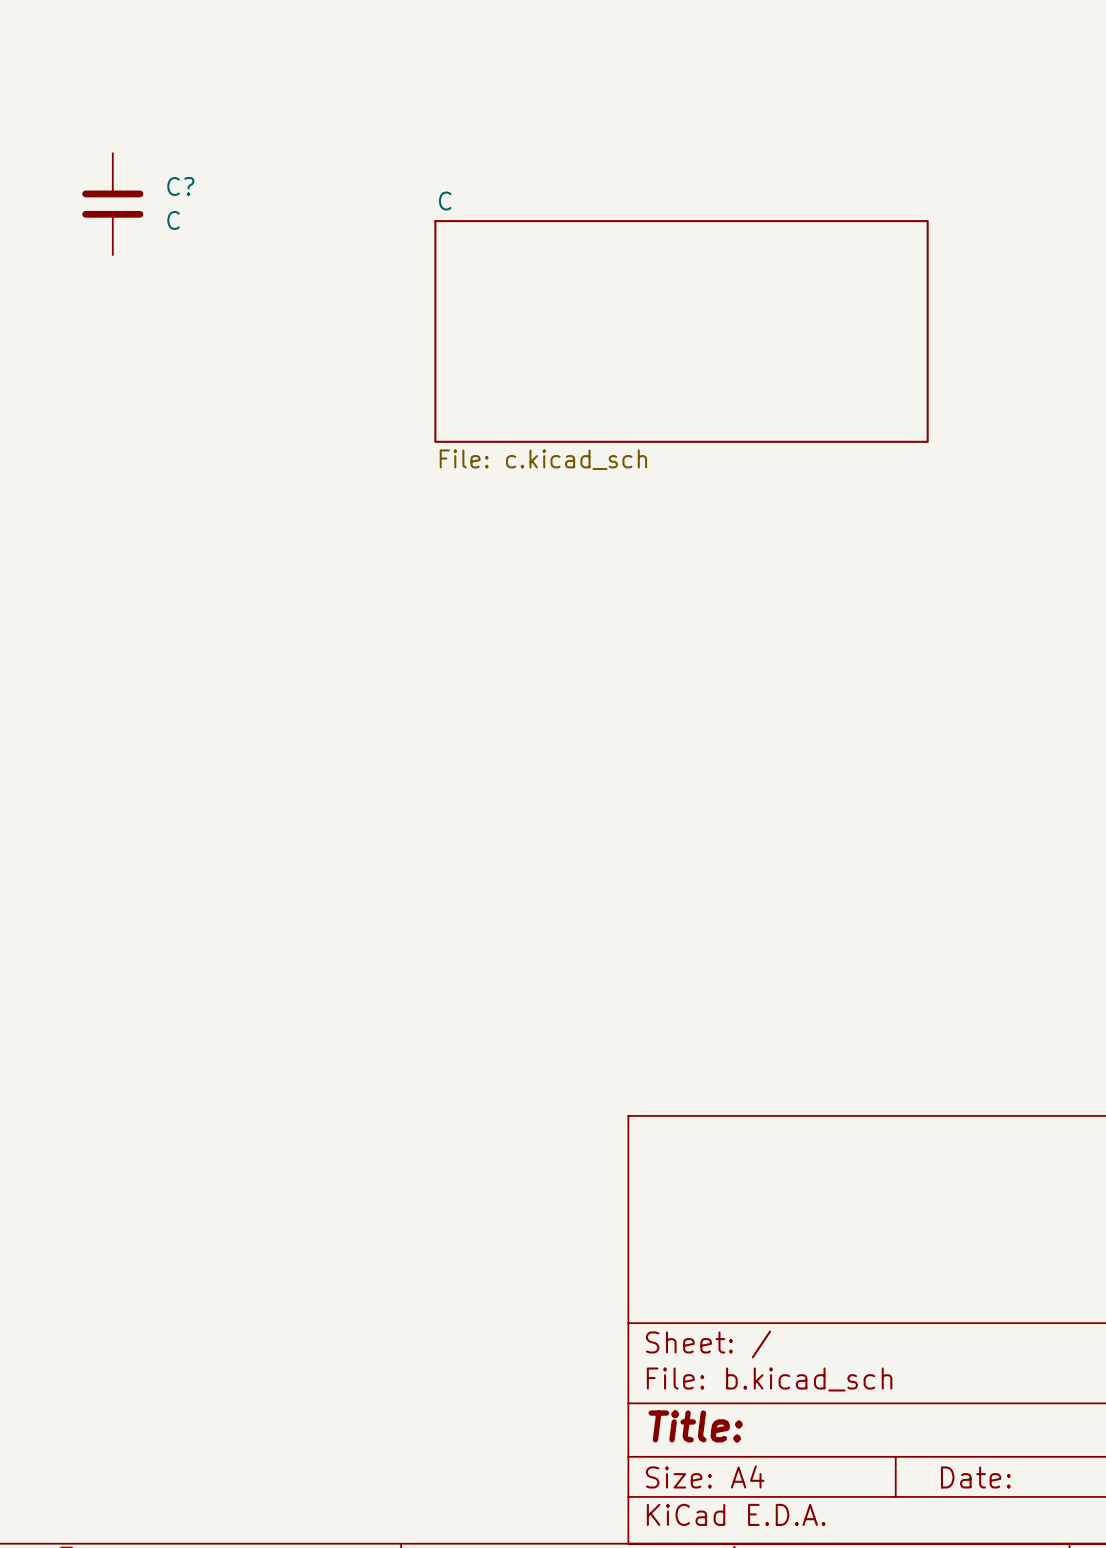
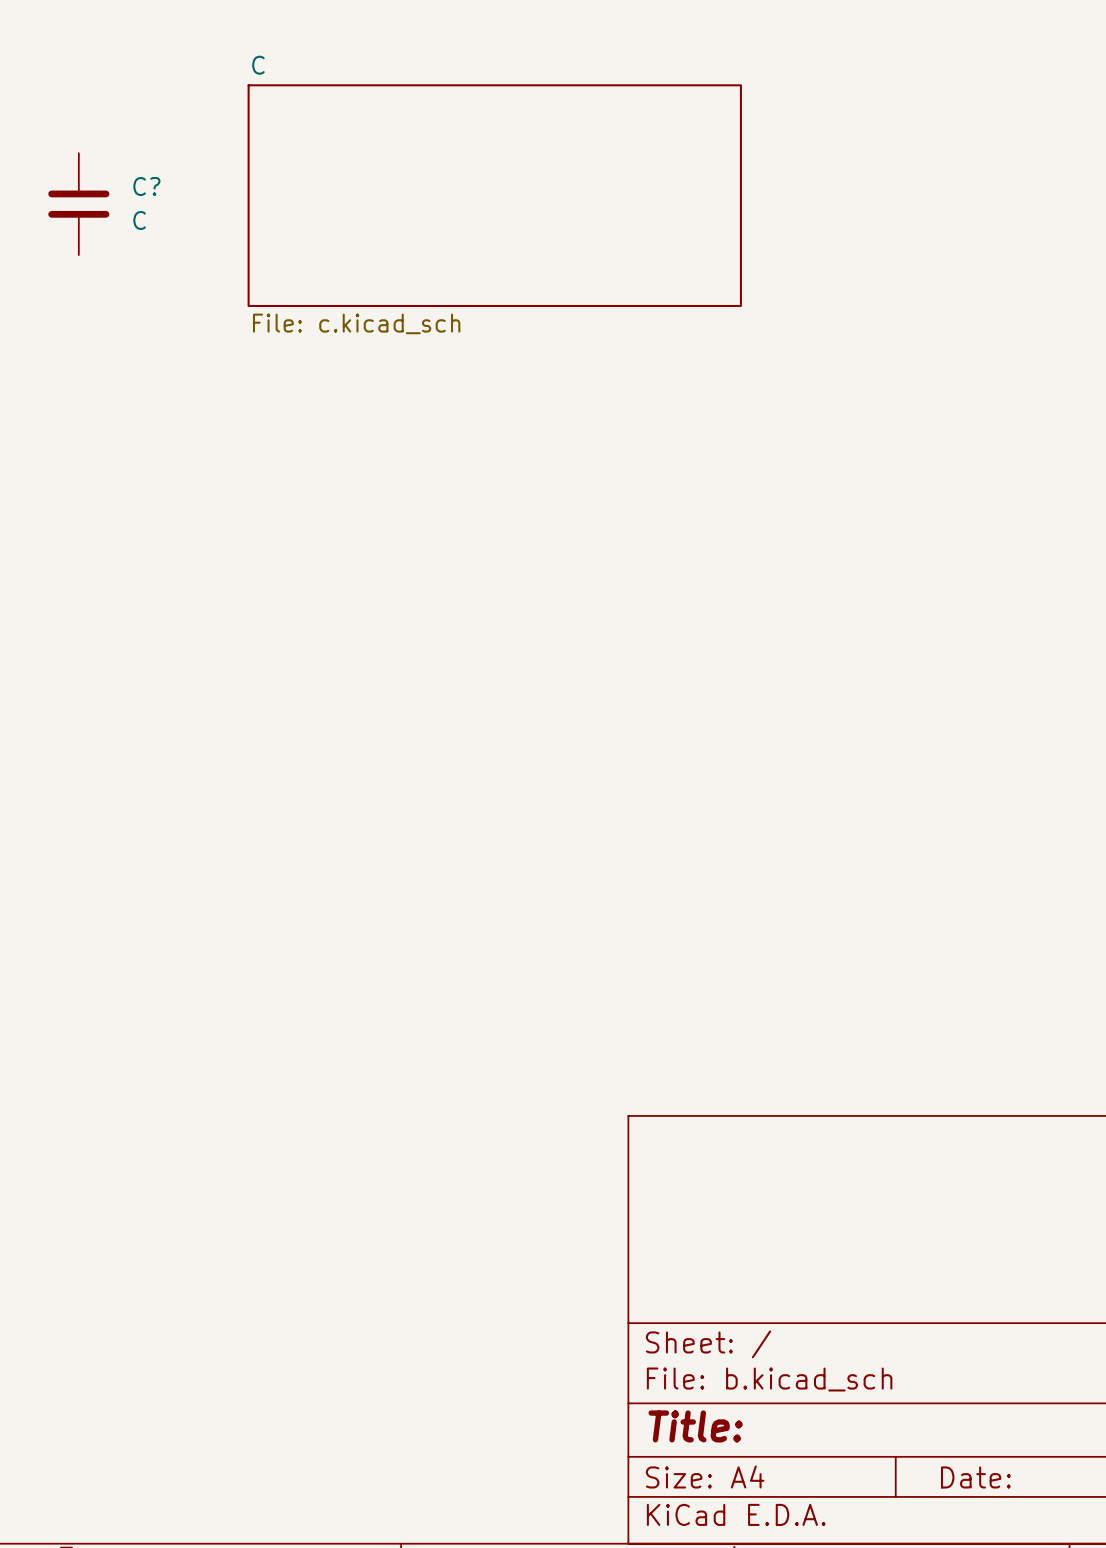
C? position: (112, 204) -> (78, 204)
sheet C position: (681, 331) -> (494, 195)

